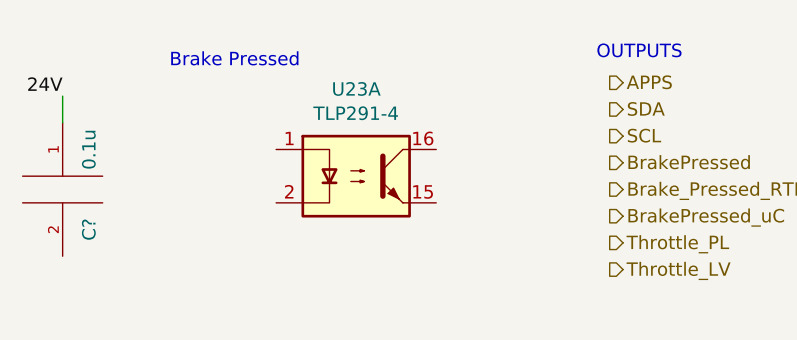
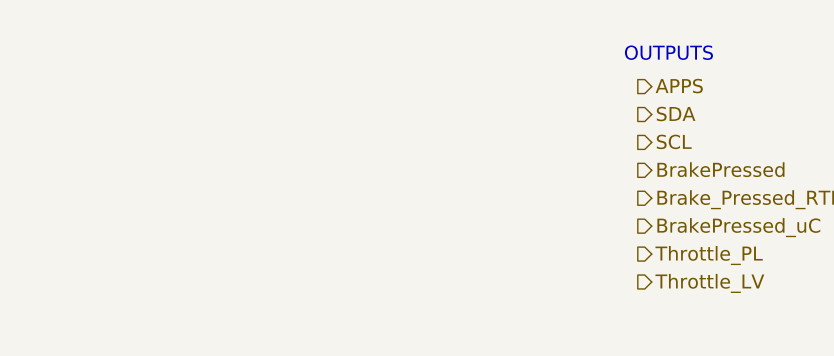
text: Brake Pressed (234, 58) -> none
label: 24V (45, 84) -> none
wire: (62, 96) (62, 122) -> none
U23A: TLP291-4 (356, 176) -> none
C?: 0.1u (62, 189) -> none

